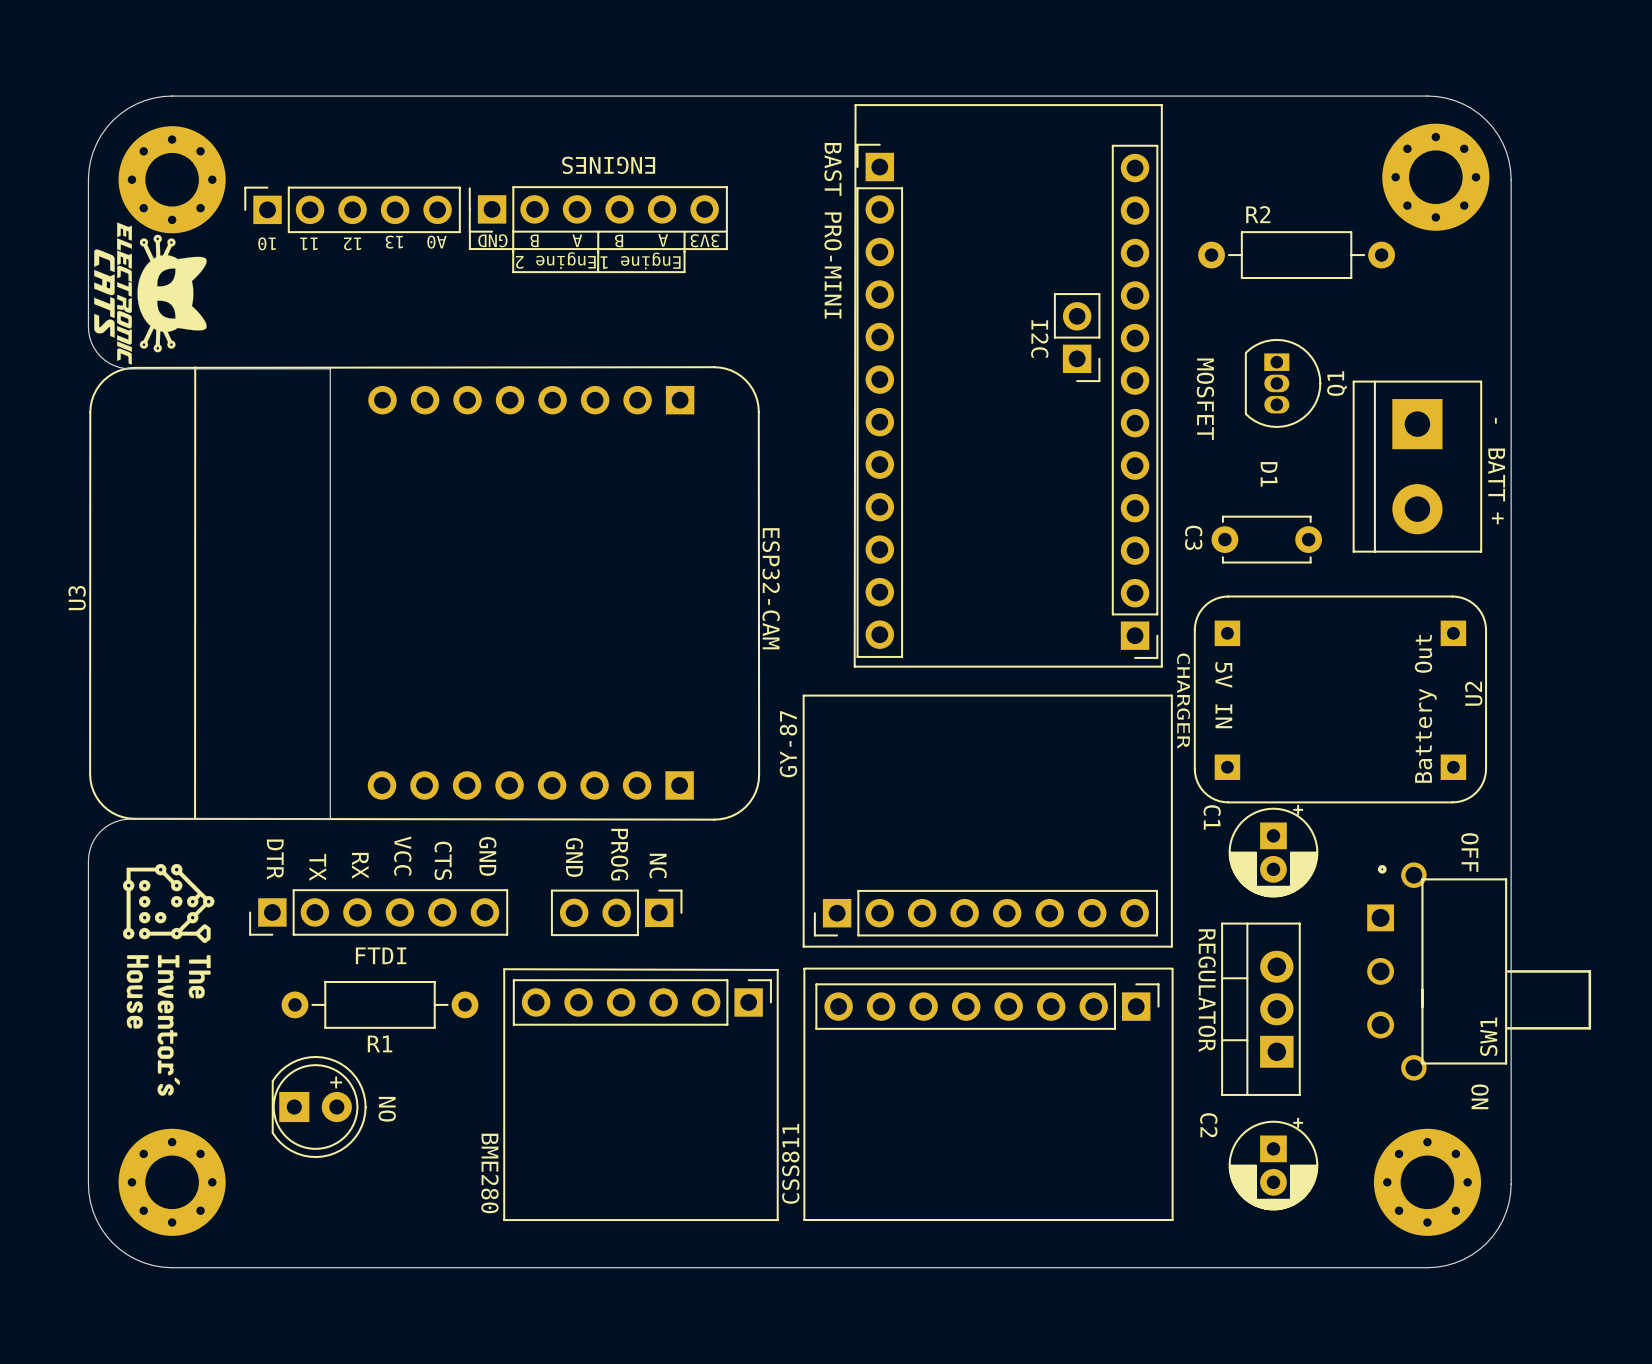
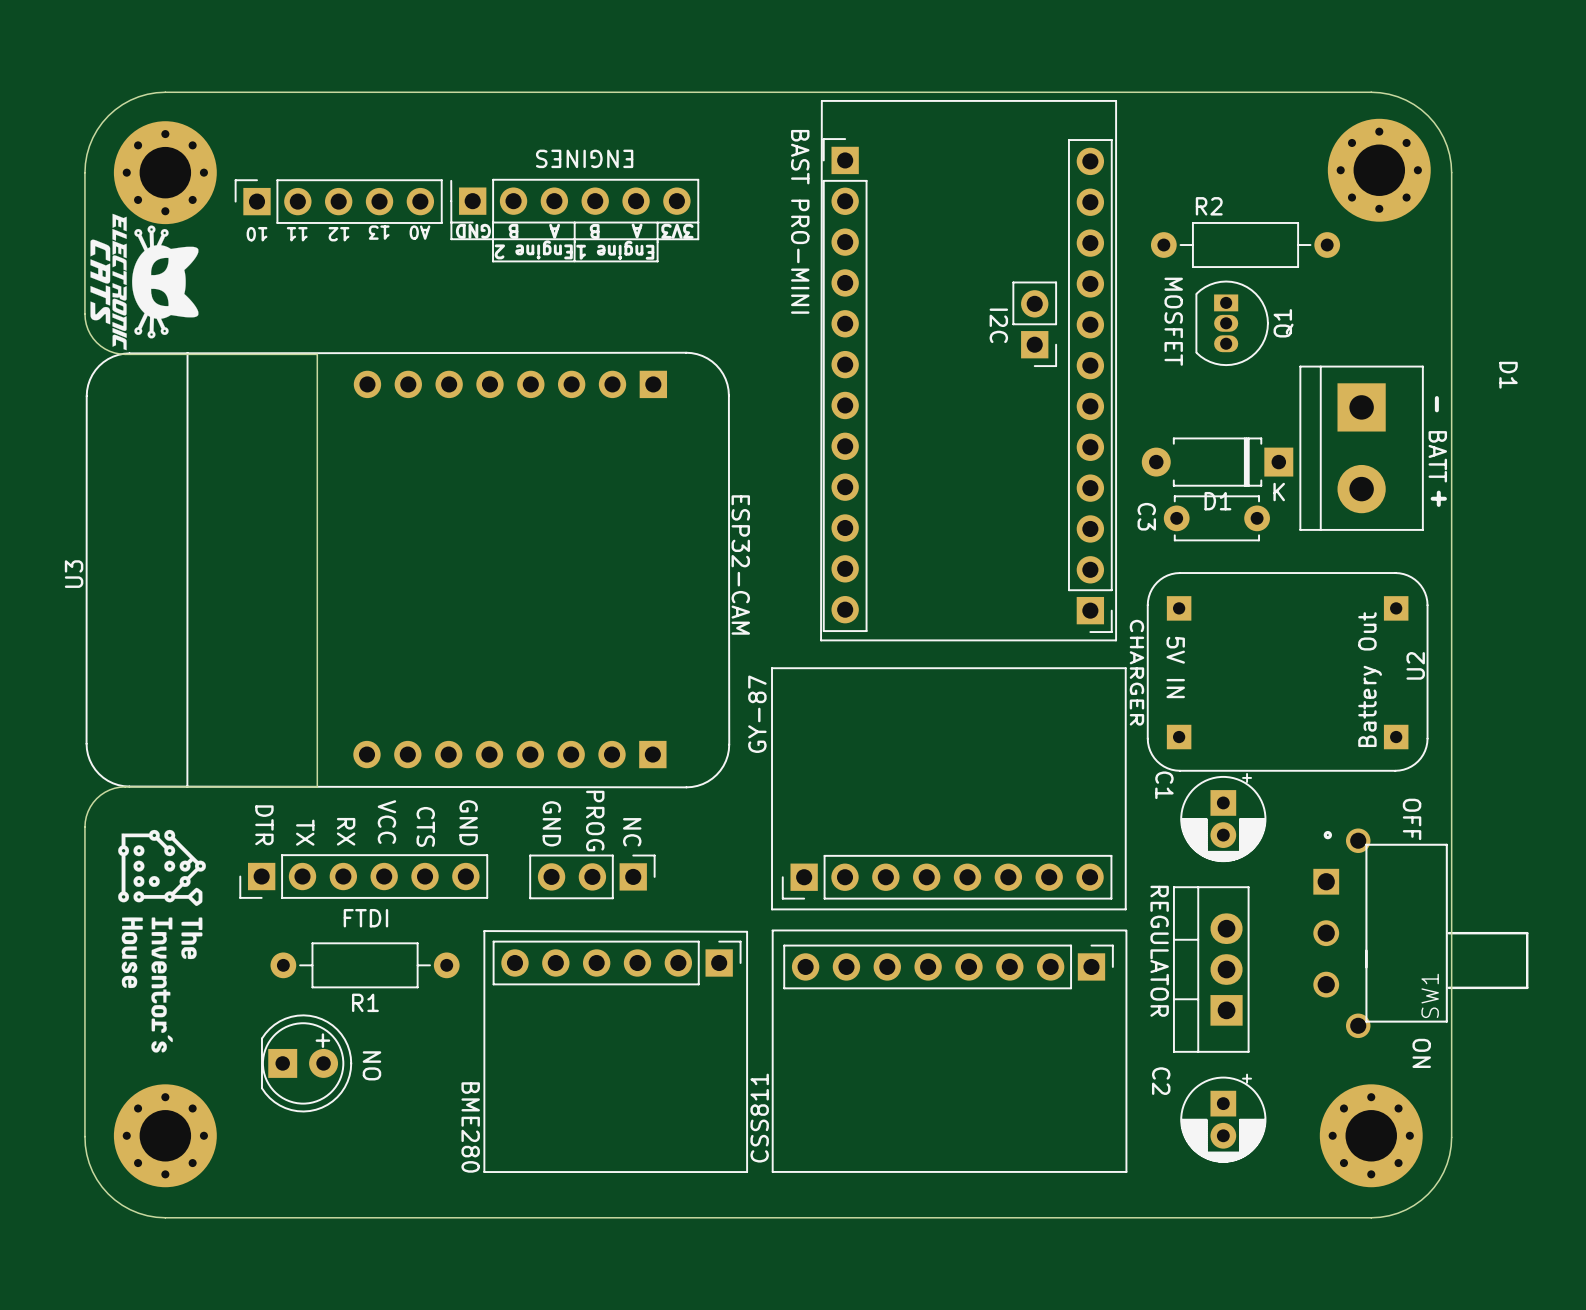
Q1 position: (1283, 383) -> (1232, 323)
text position: MOSFET (1205, 399) -> MOSFET (1173, 321)
text position: D1 (1269, 474) -> D1 (1508, 375)
D1: none -> (1217, 462)

